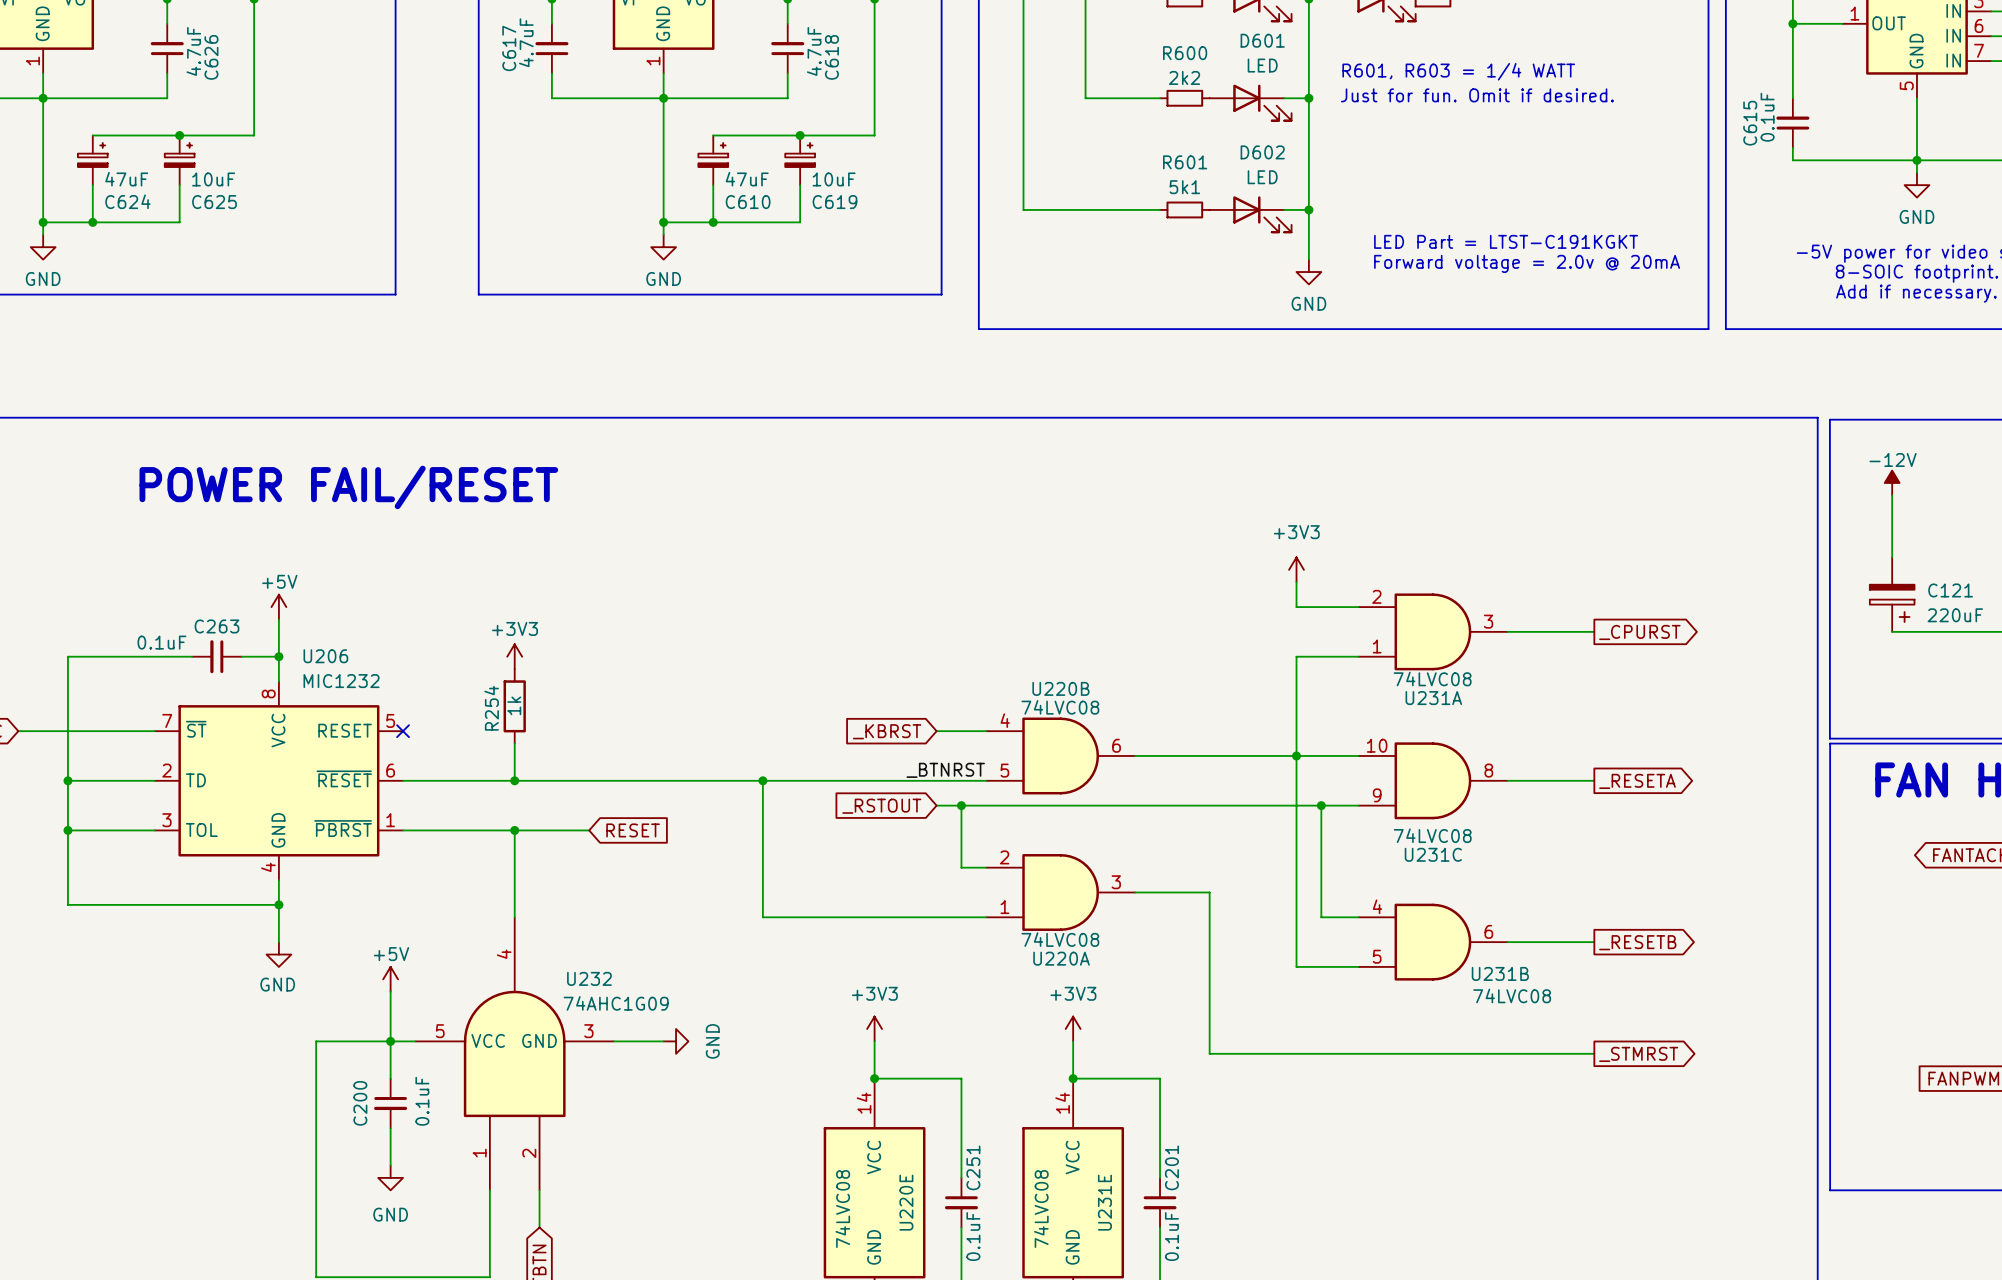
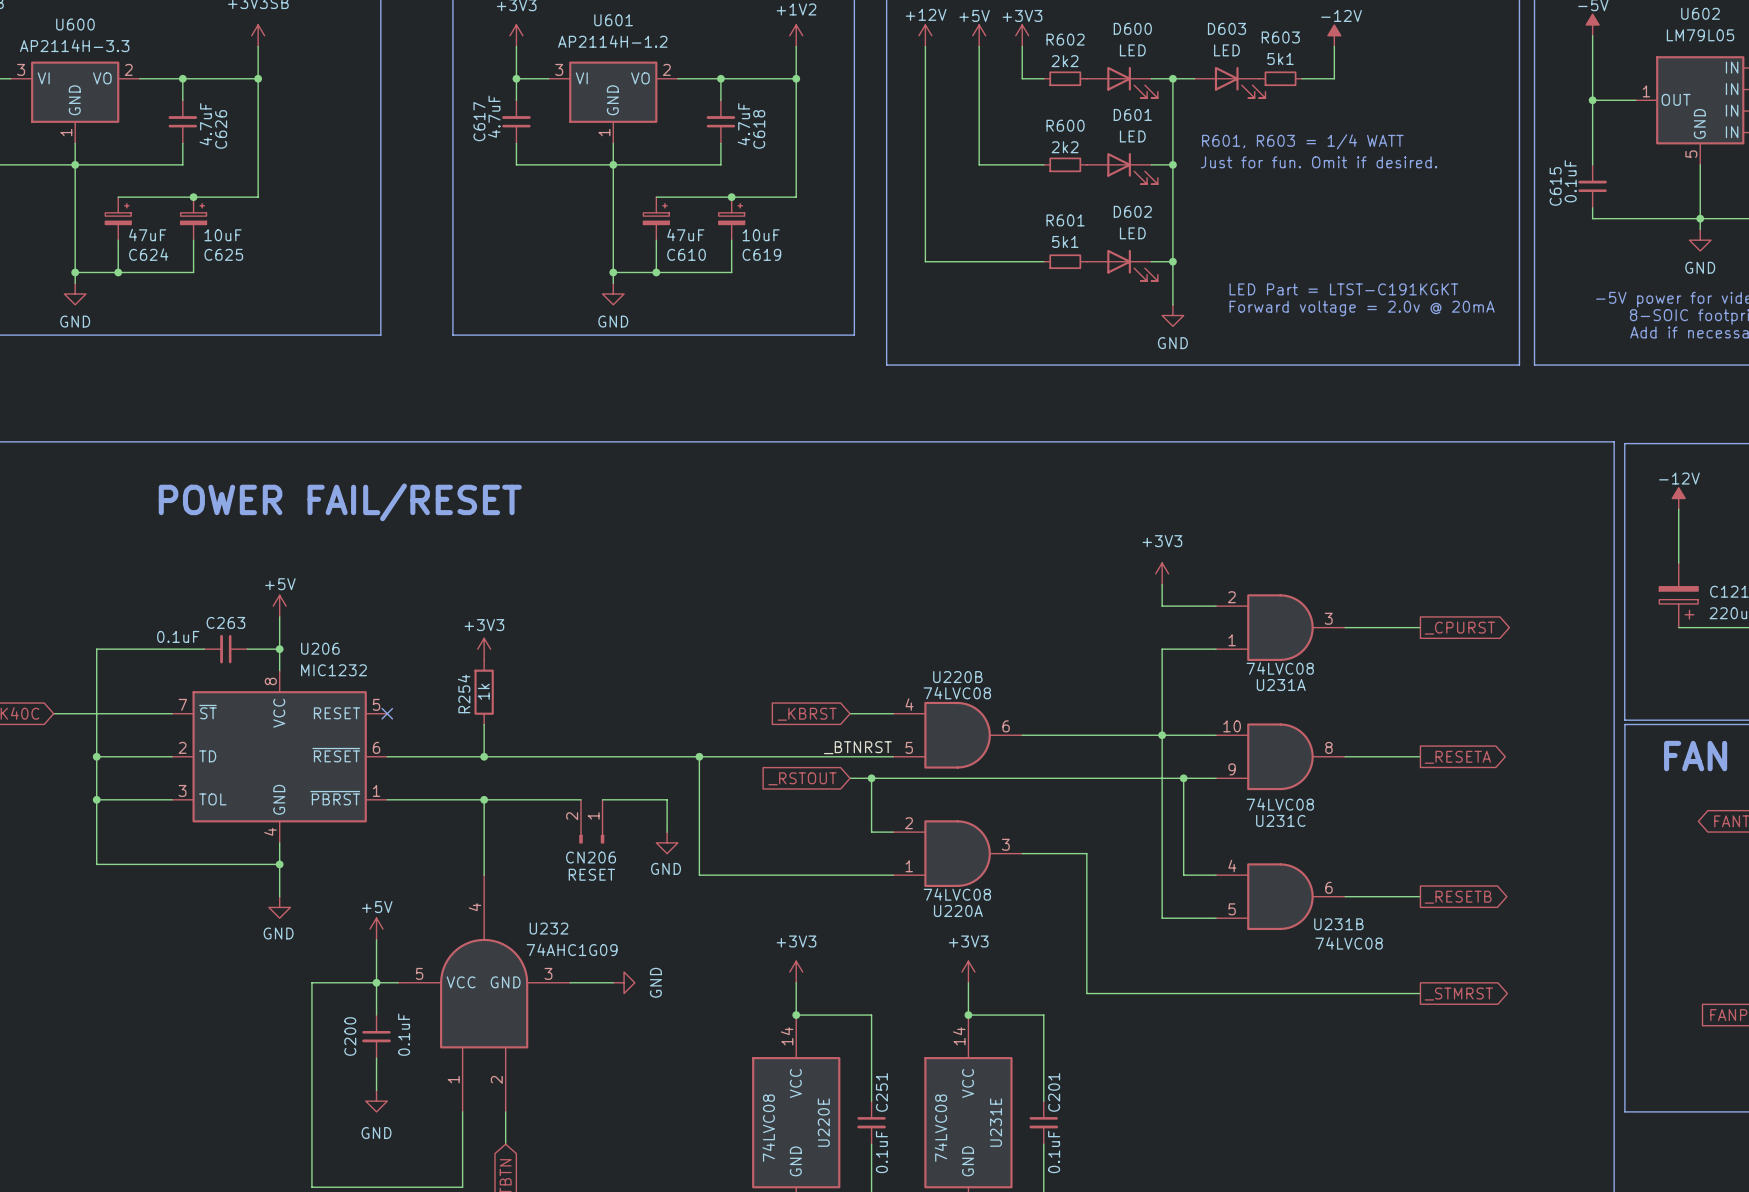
wire: none -> (548, 799) (581, 799)
global label: RESET (633, 830) -> none
wire: none -> (602, 799) (667, 799) (667, 832)
CN206: none -> RESET (591, 821)
power symbol: none -> GND (667, 842)

